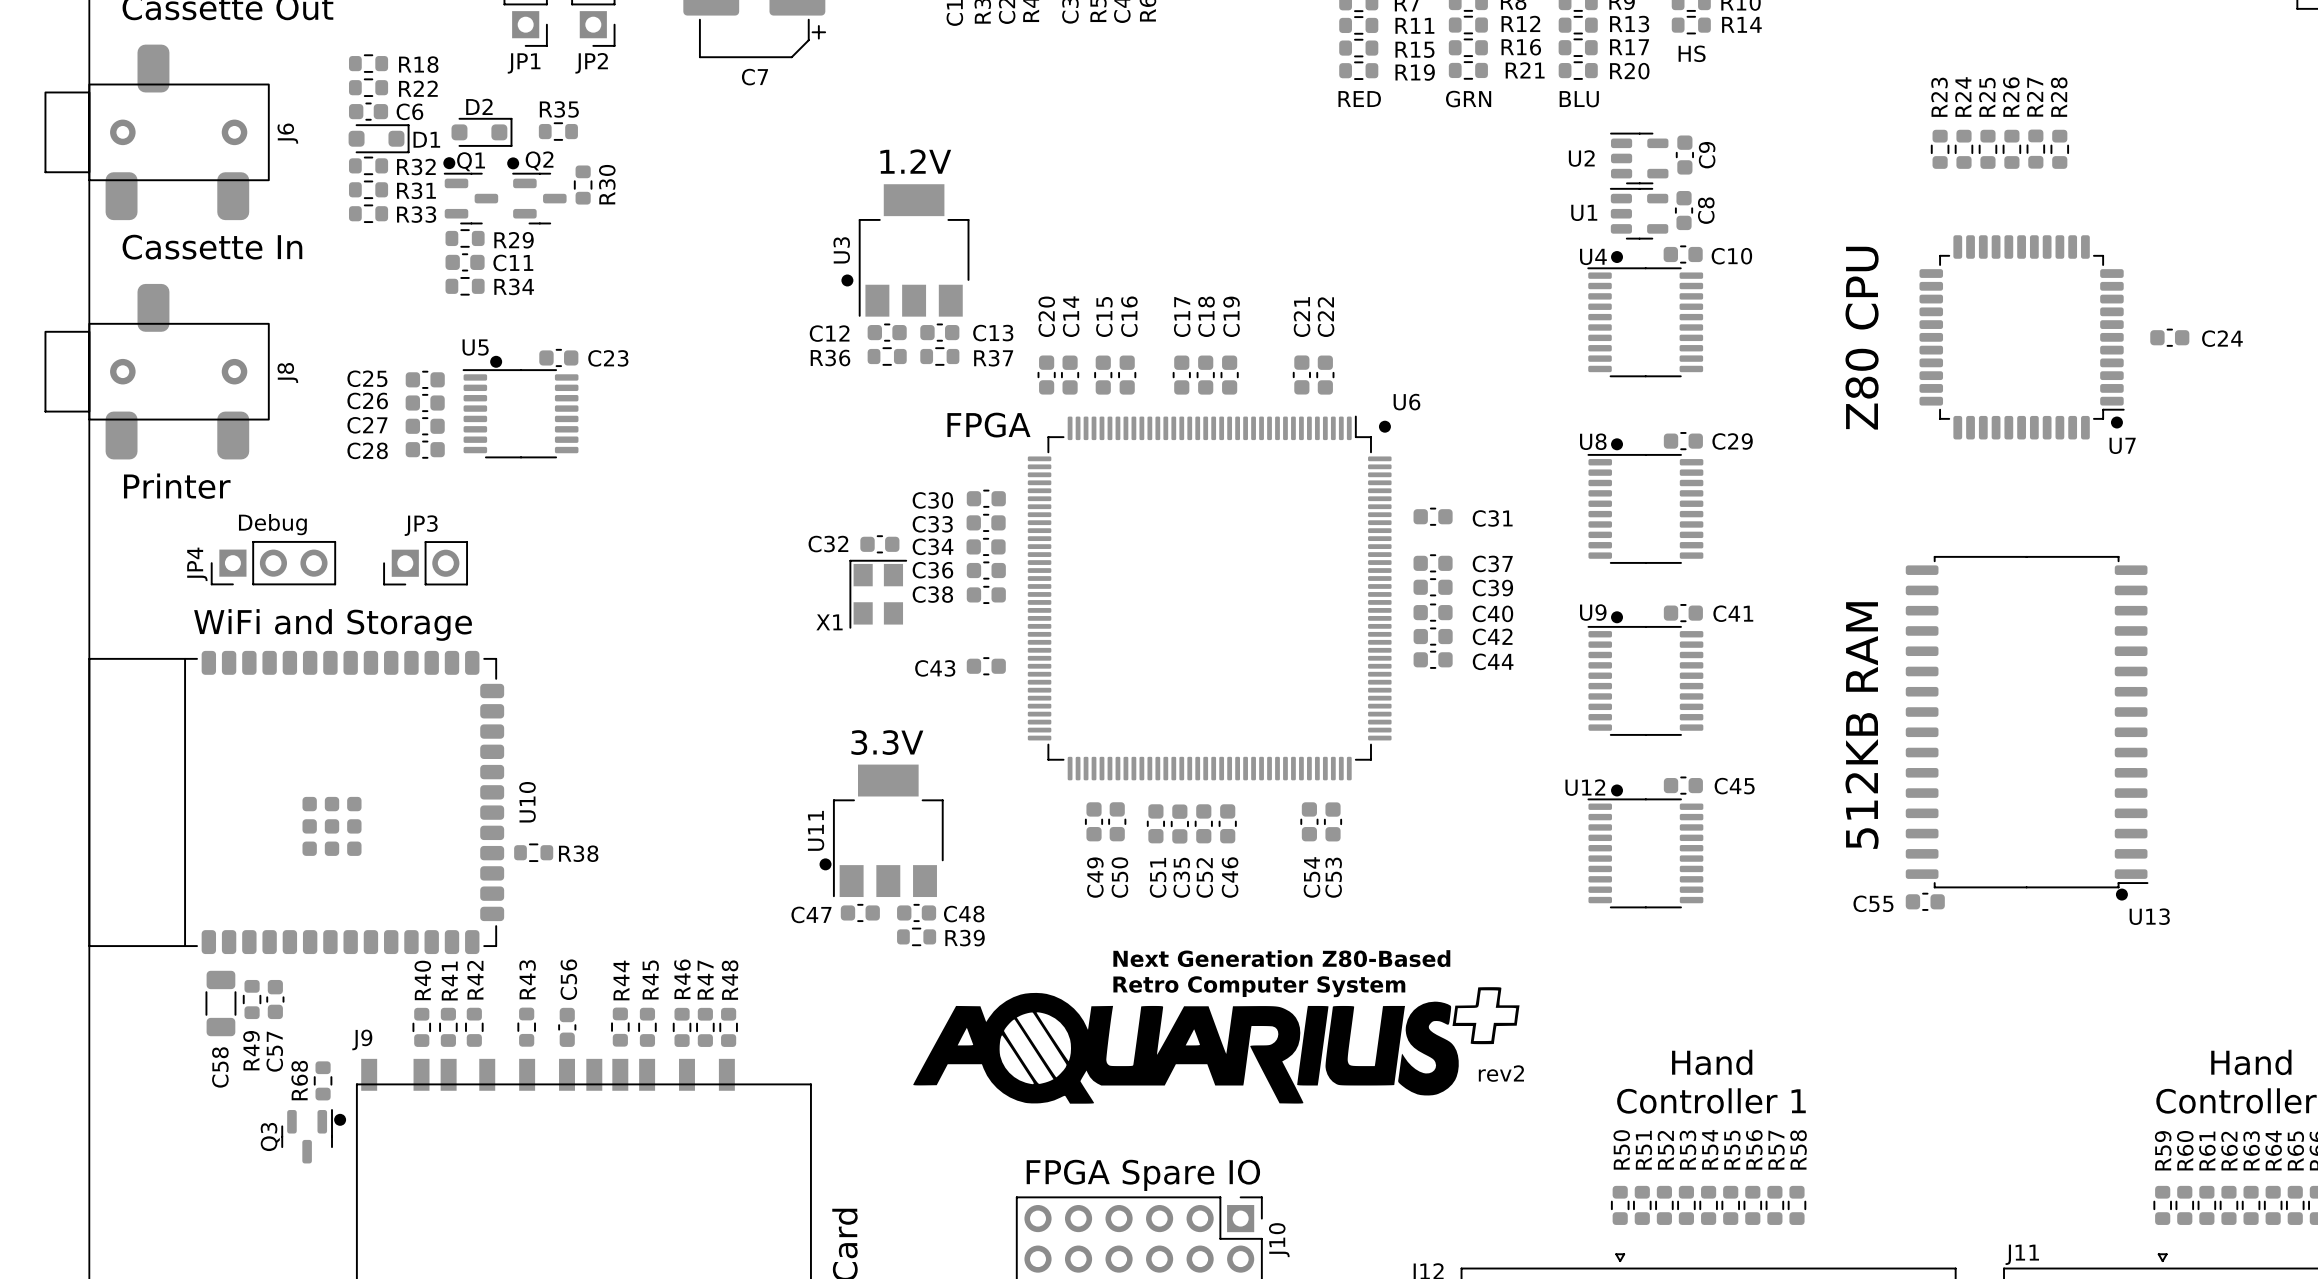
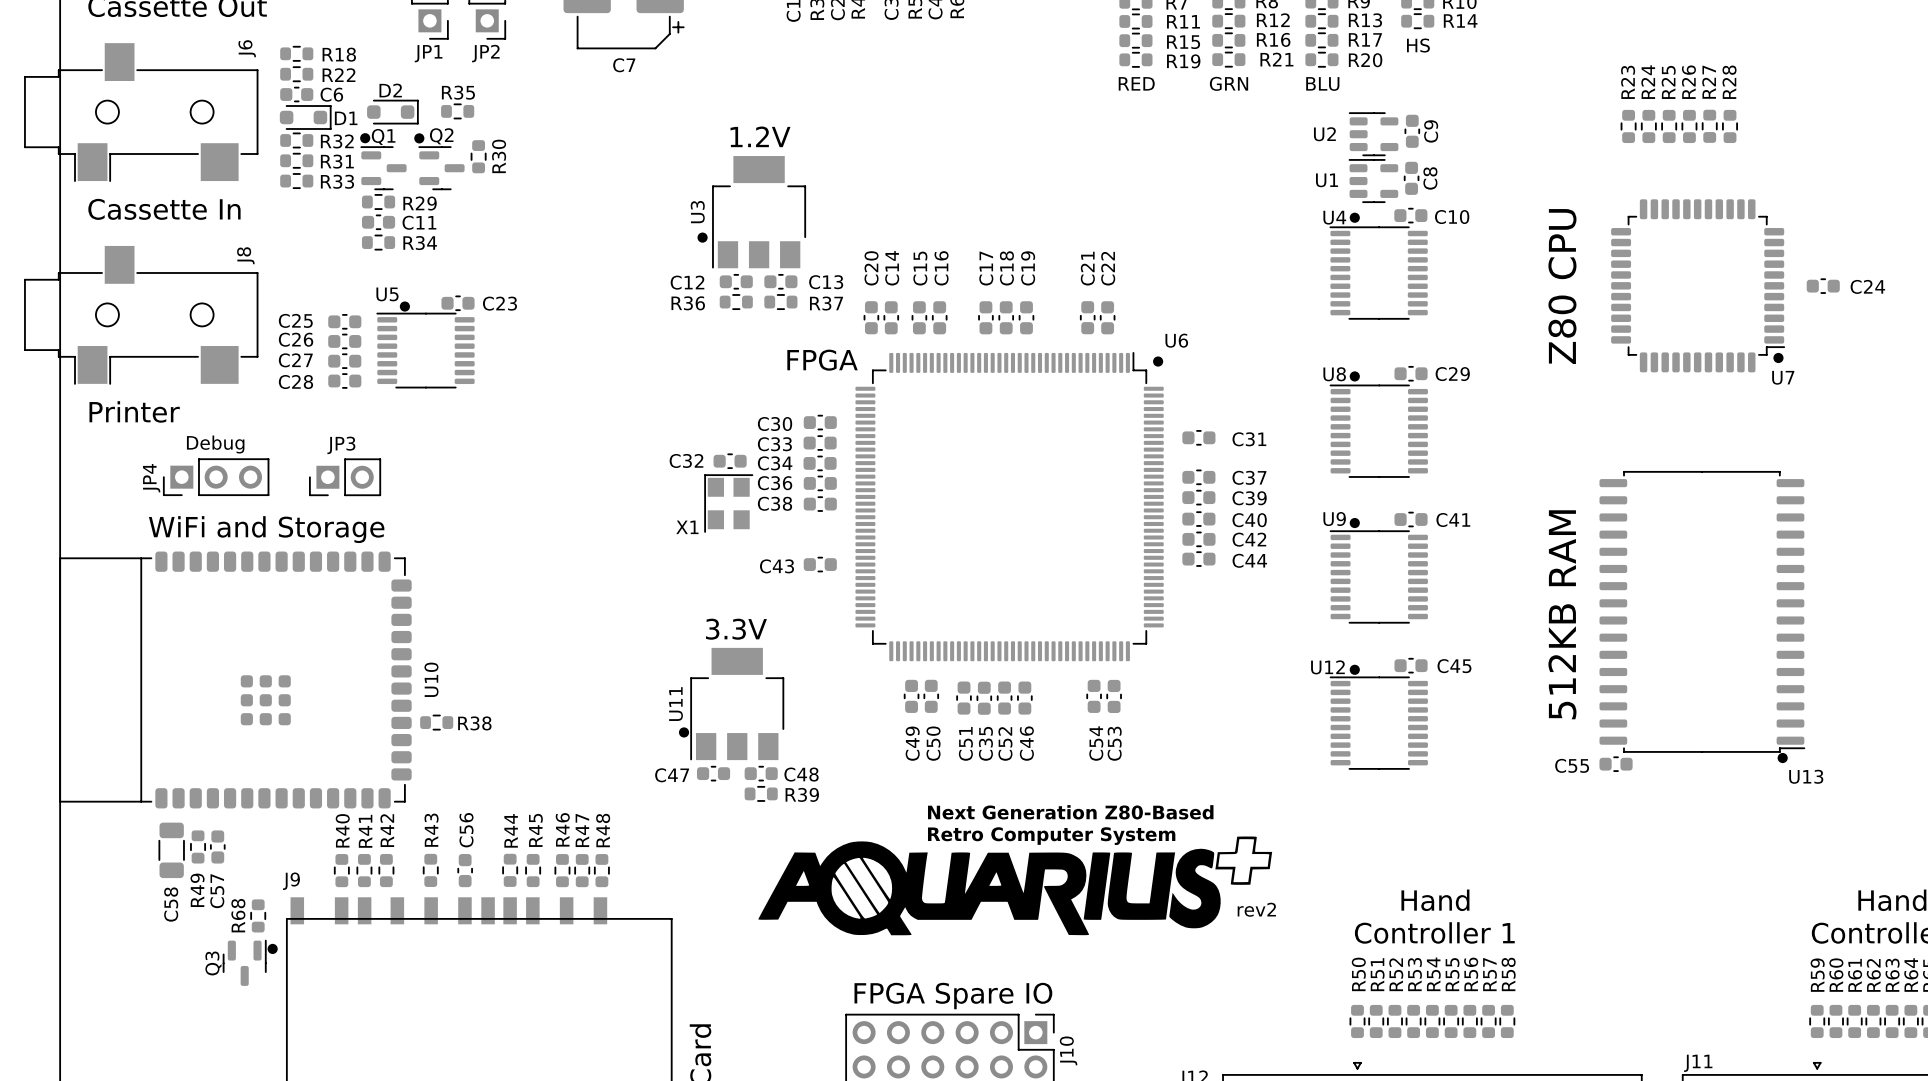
J6 footprint: [44, 44, 270, 221] -> [24, 43, 259, 182]
J6 name position: J6 (287, 133) -> J6 (247, 48)
J8 footprint: [44, 283, 270, 460] -> [24, 245, 259, 385]
J8 name position: J8 (287, 373) -> J8 (245, 255)

